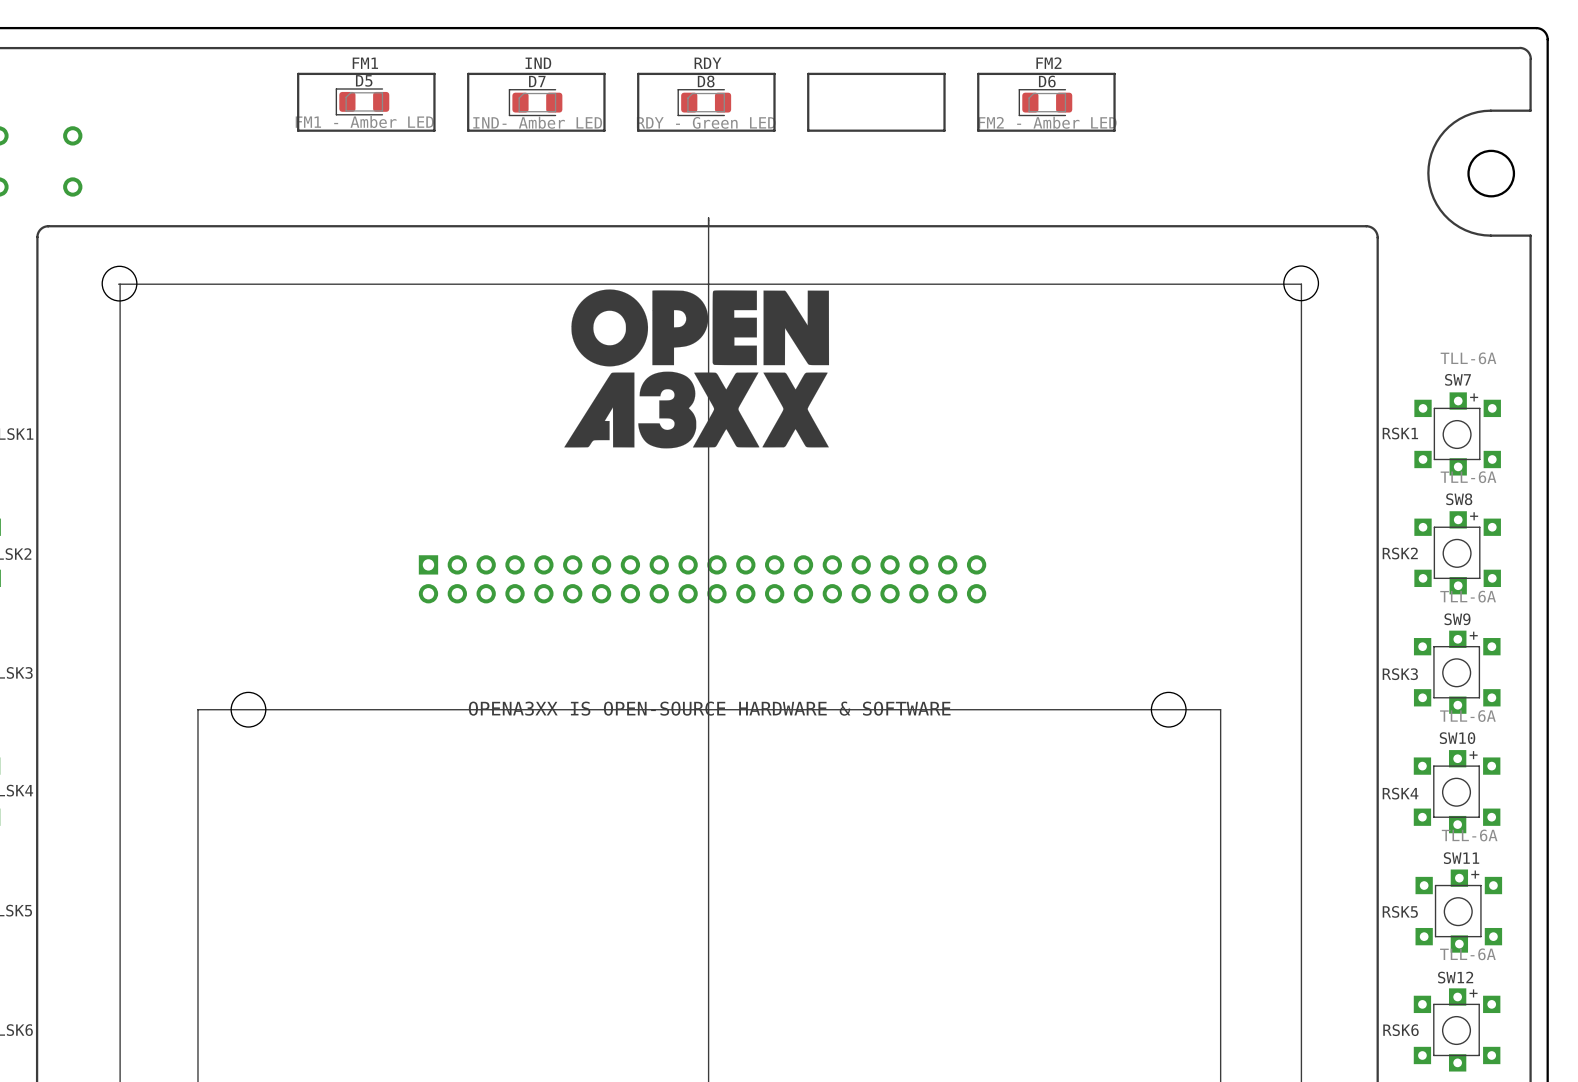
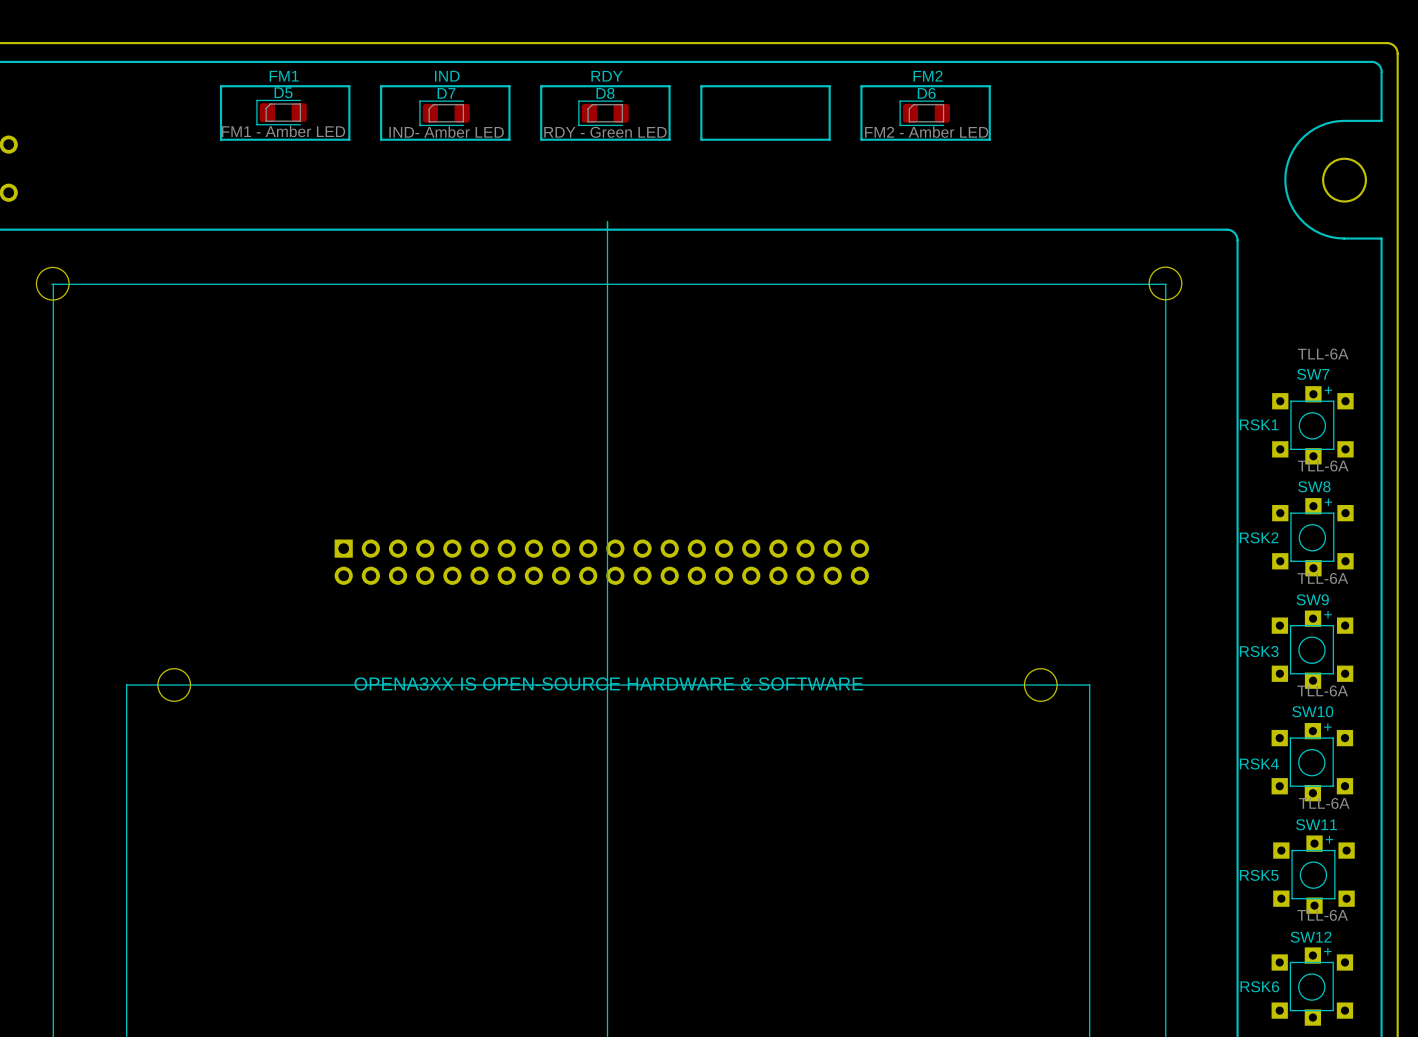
drawing: [564, 289, 830, 449] -> none

